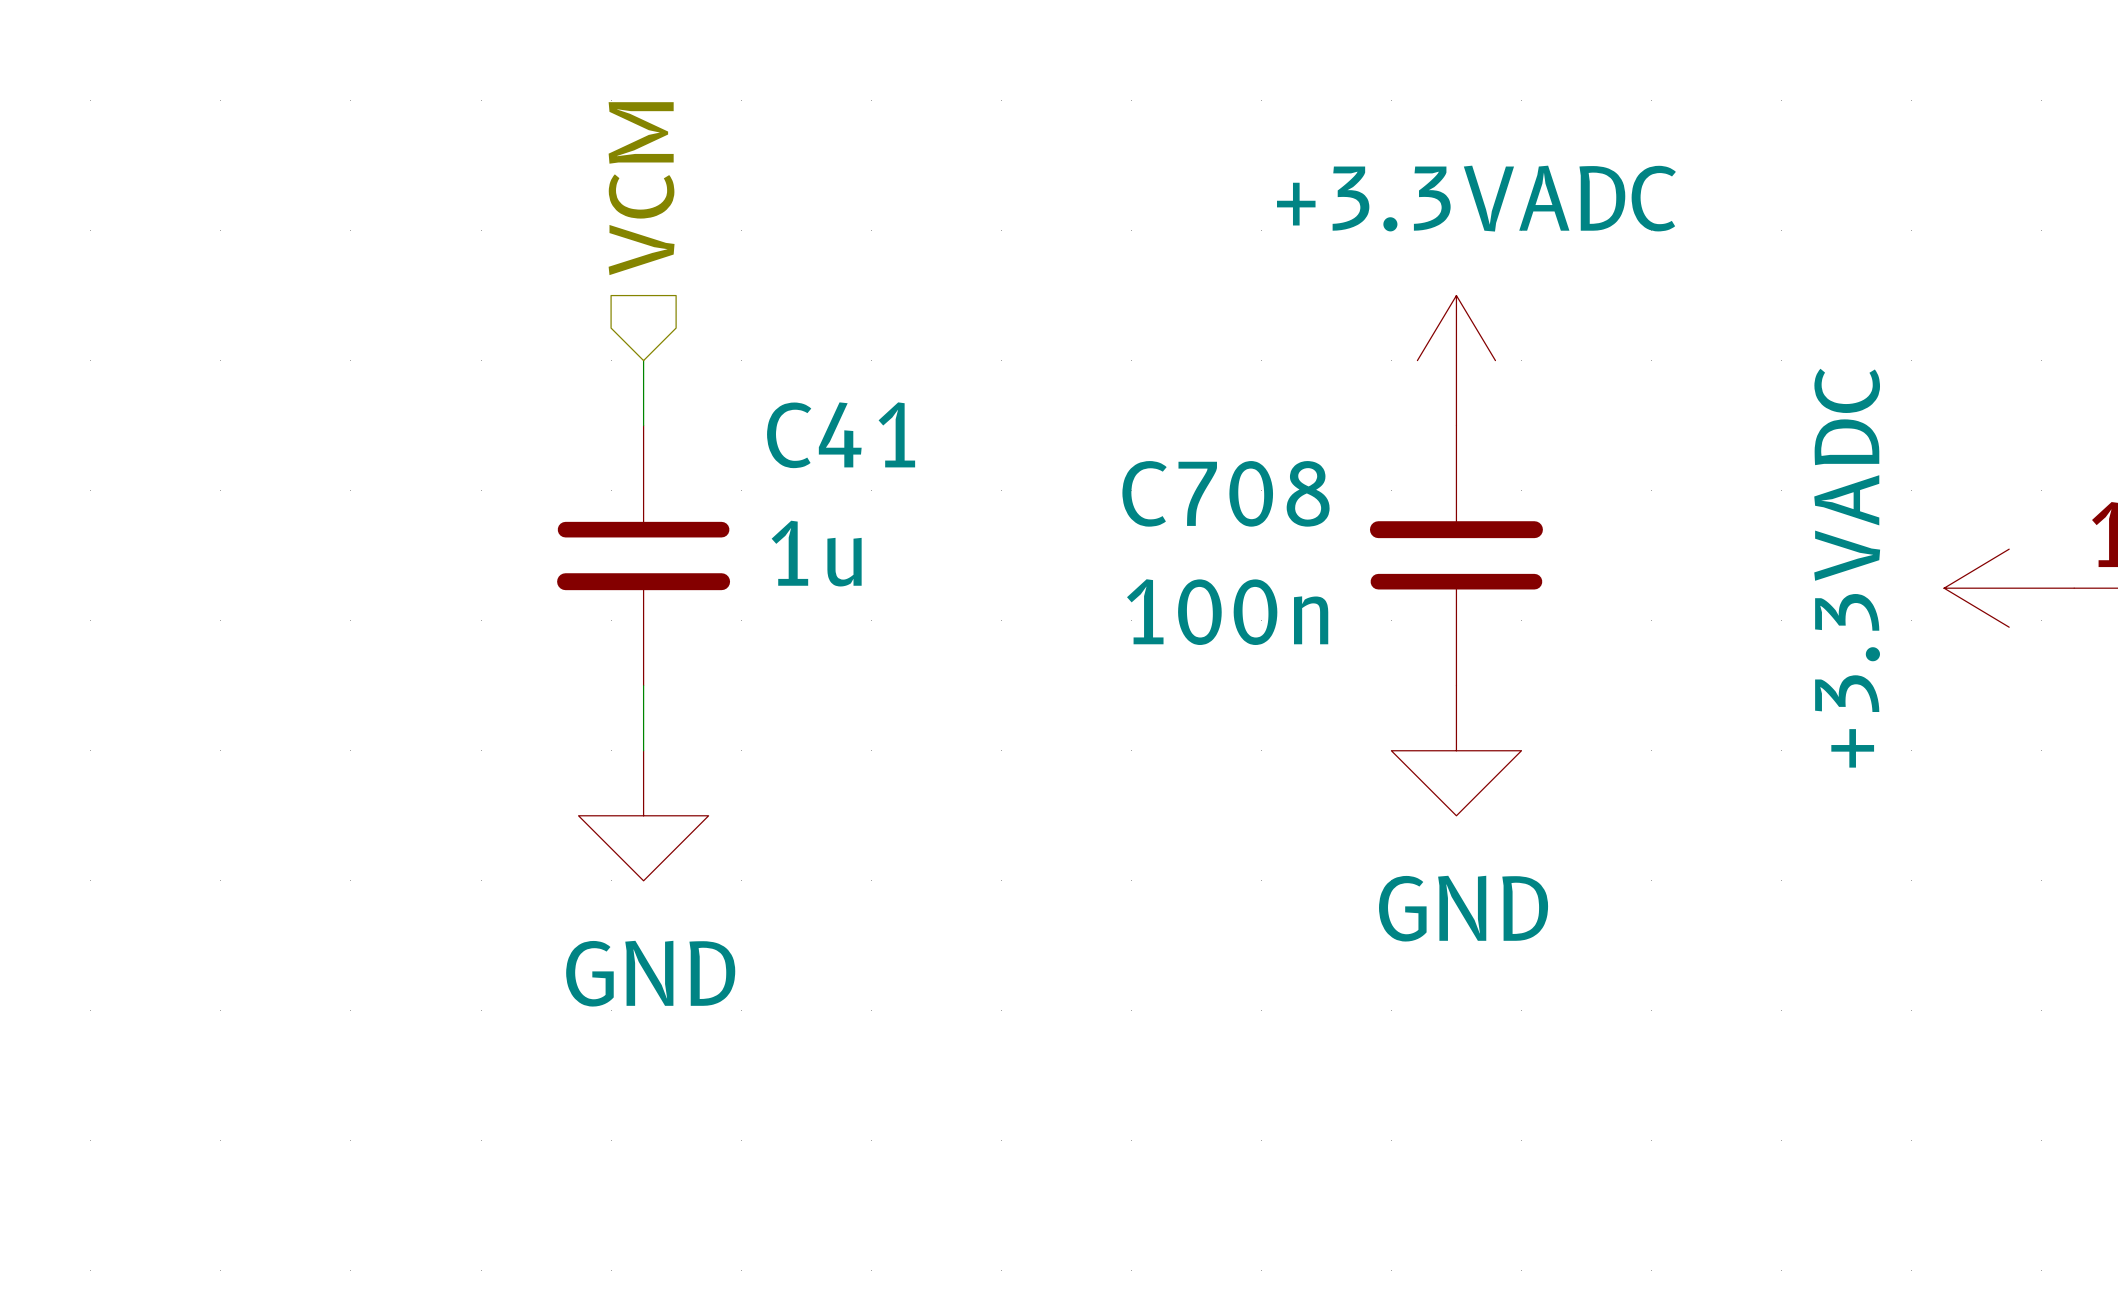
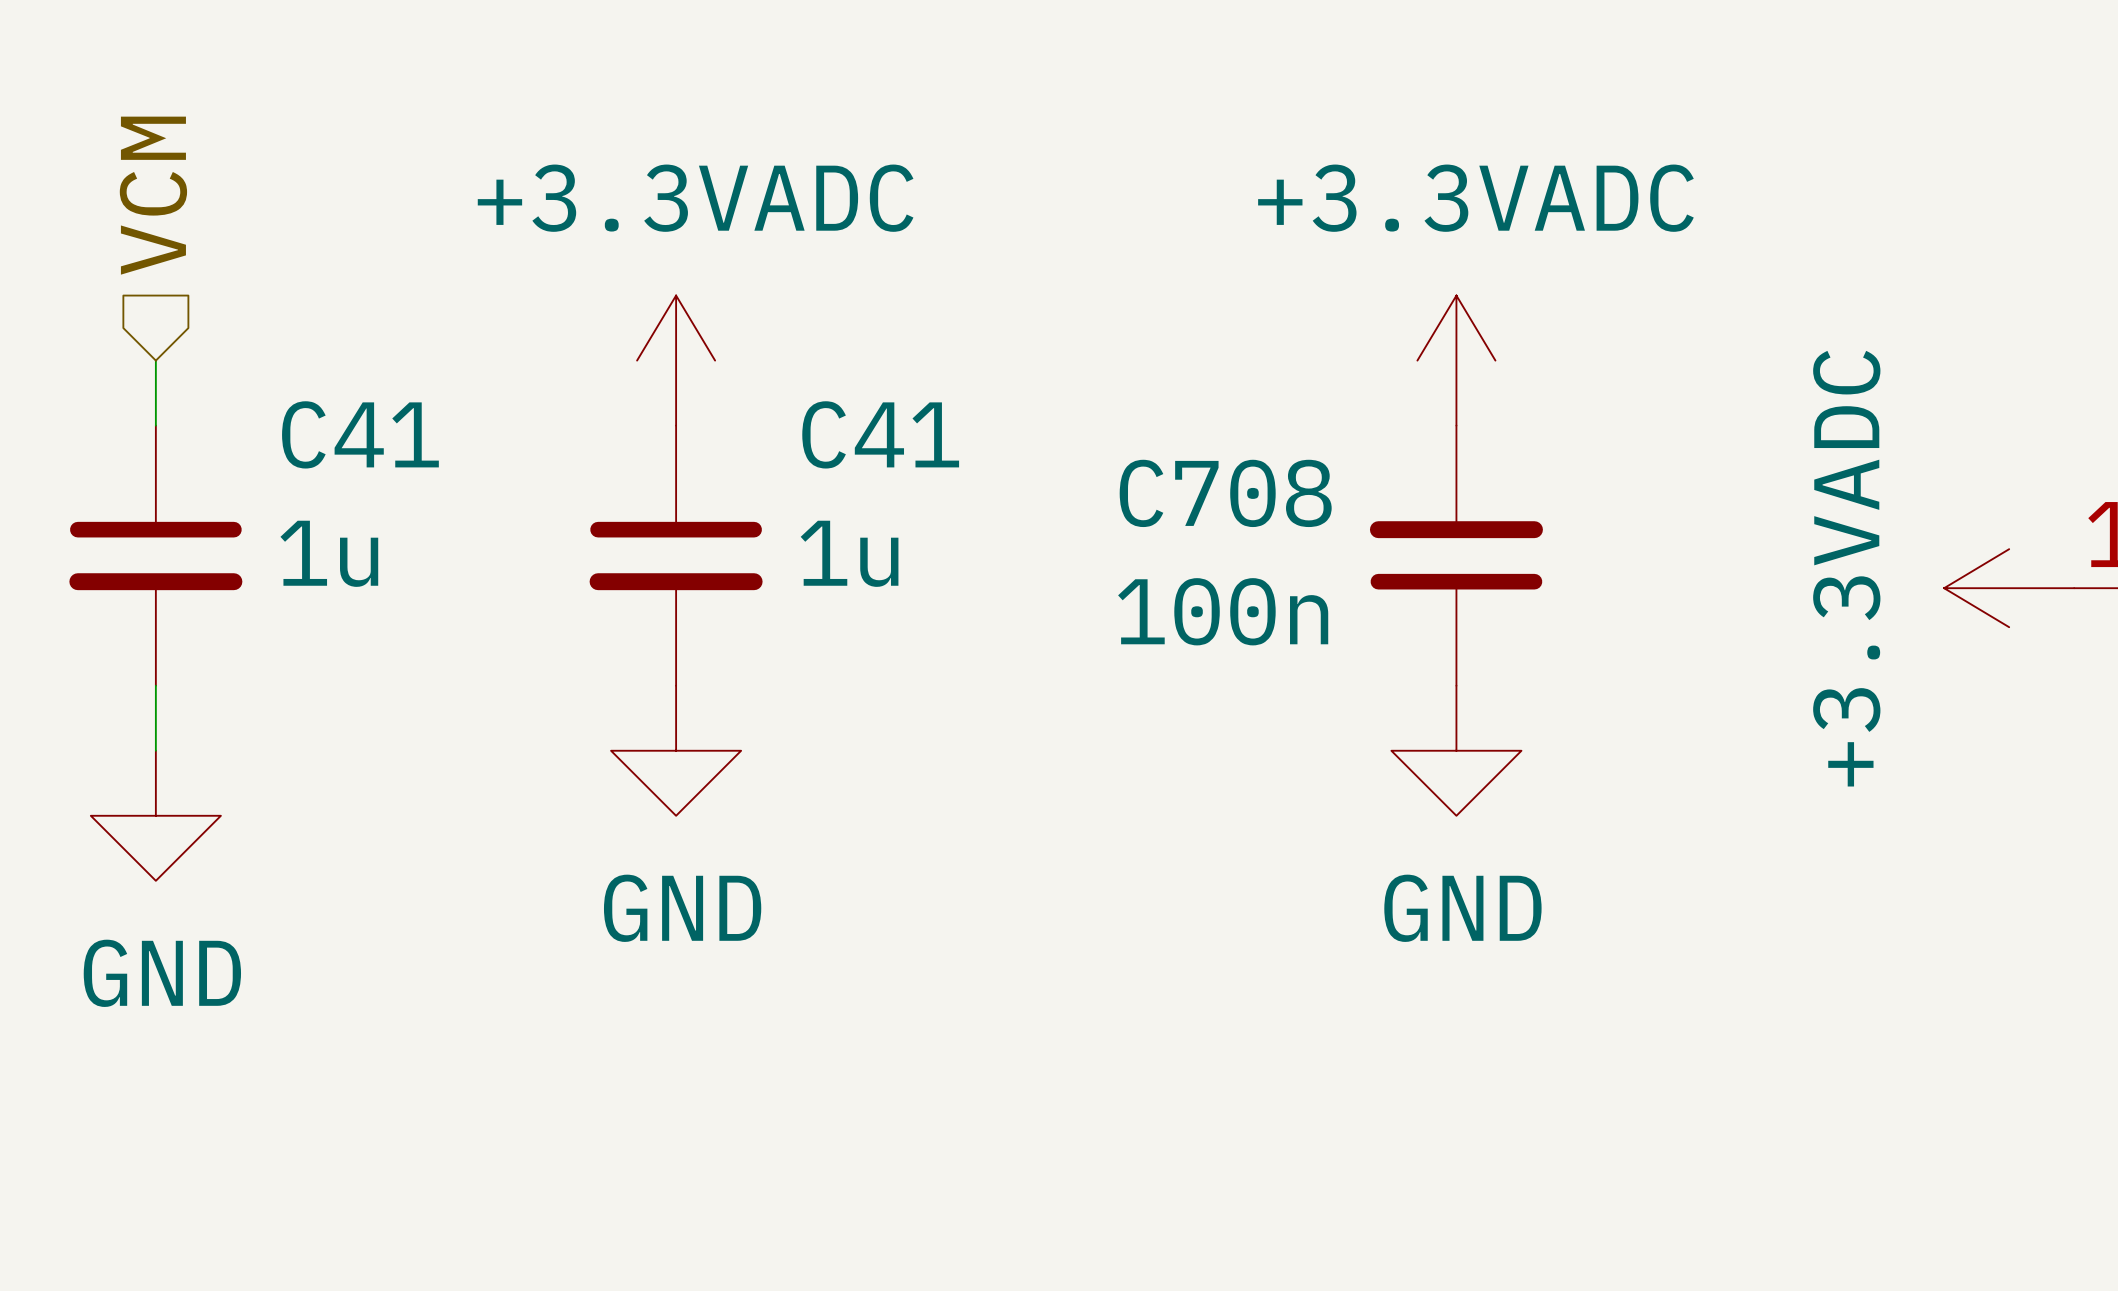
hierarchical label position: VCM (641, 188) -> VCM (153, 195)
wire: (643, 360) (643, 425) -> (155, 360) (155, 425)
power symbol: none -> +3.3VADC (676, 360)
C41: none -> 1u (155, 555)
C41 position: (643, 555) -> (676, 555)
wire: (643, 685) (643, 750) -> (155, 685) (155, 750)
power symbol: none -> GND (155, 815)
power symbol position: GND (643, 815) -> GND (676, 750)

